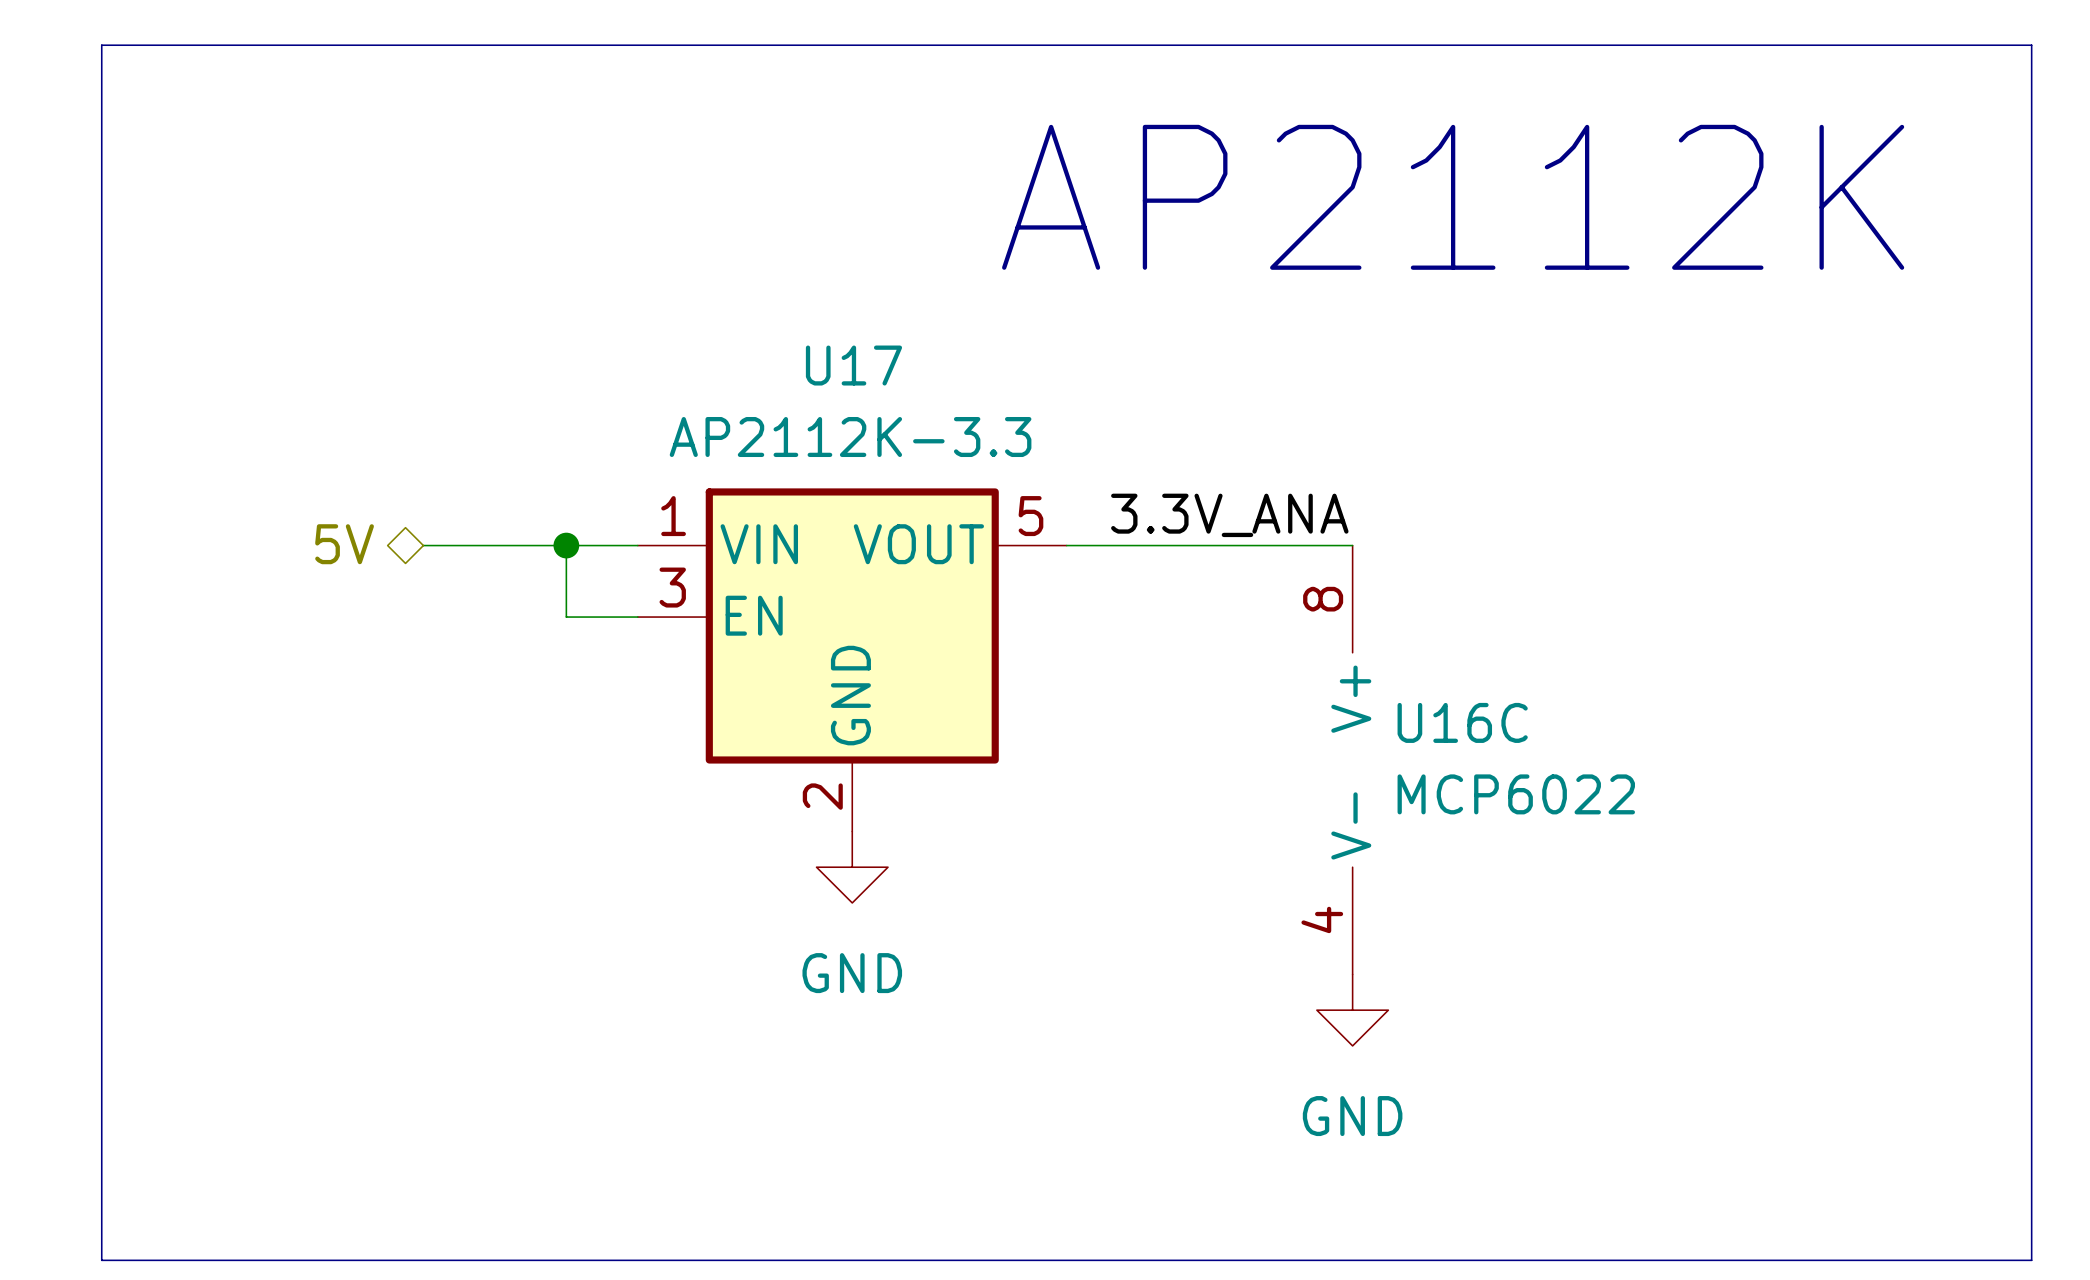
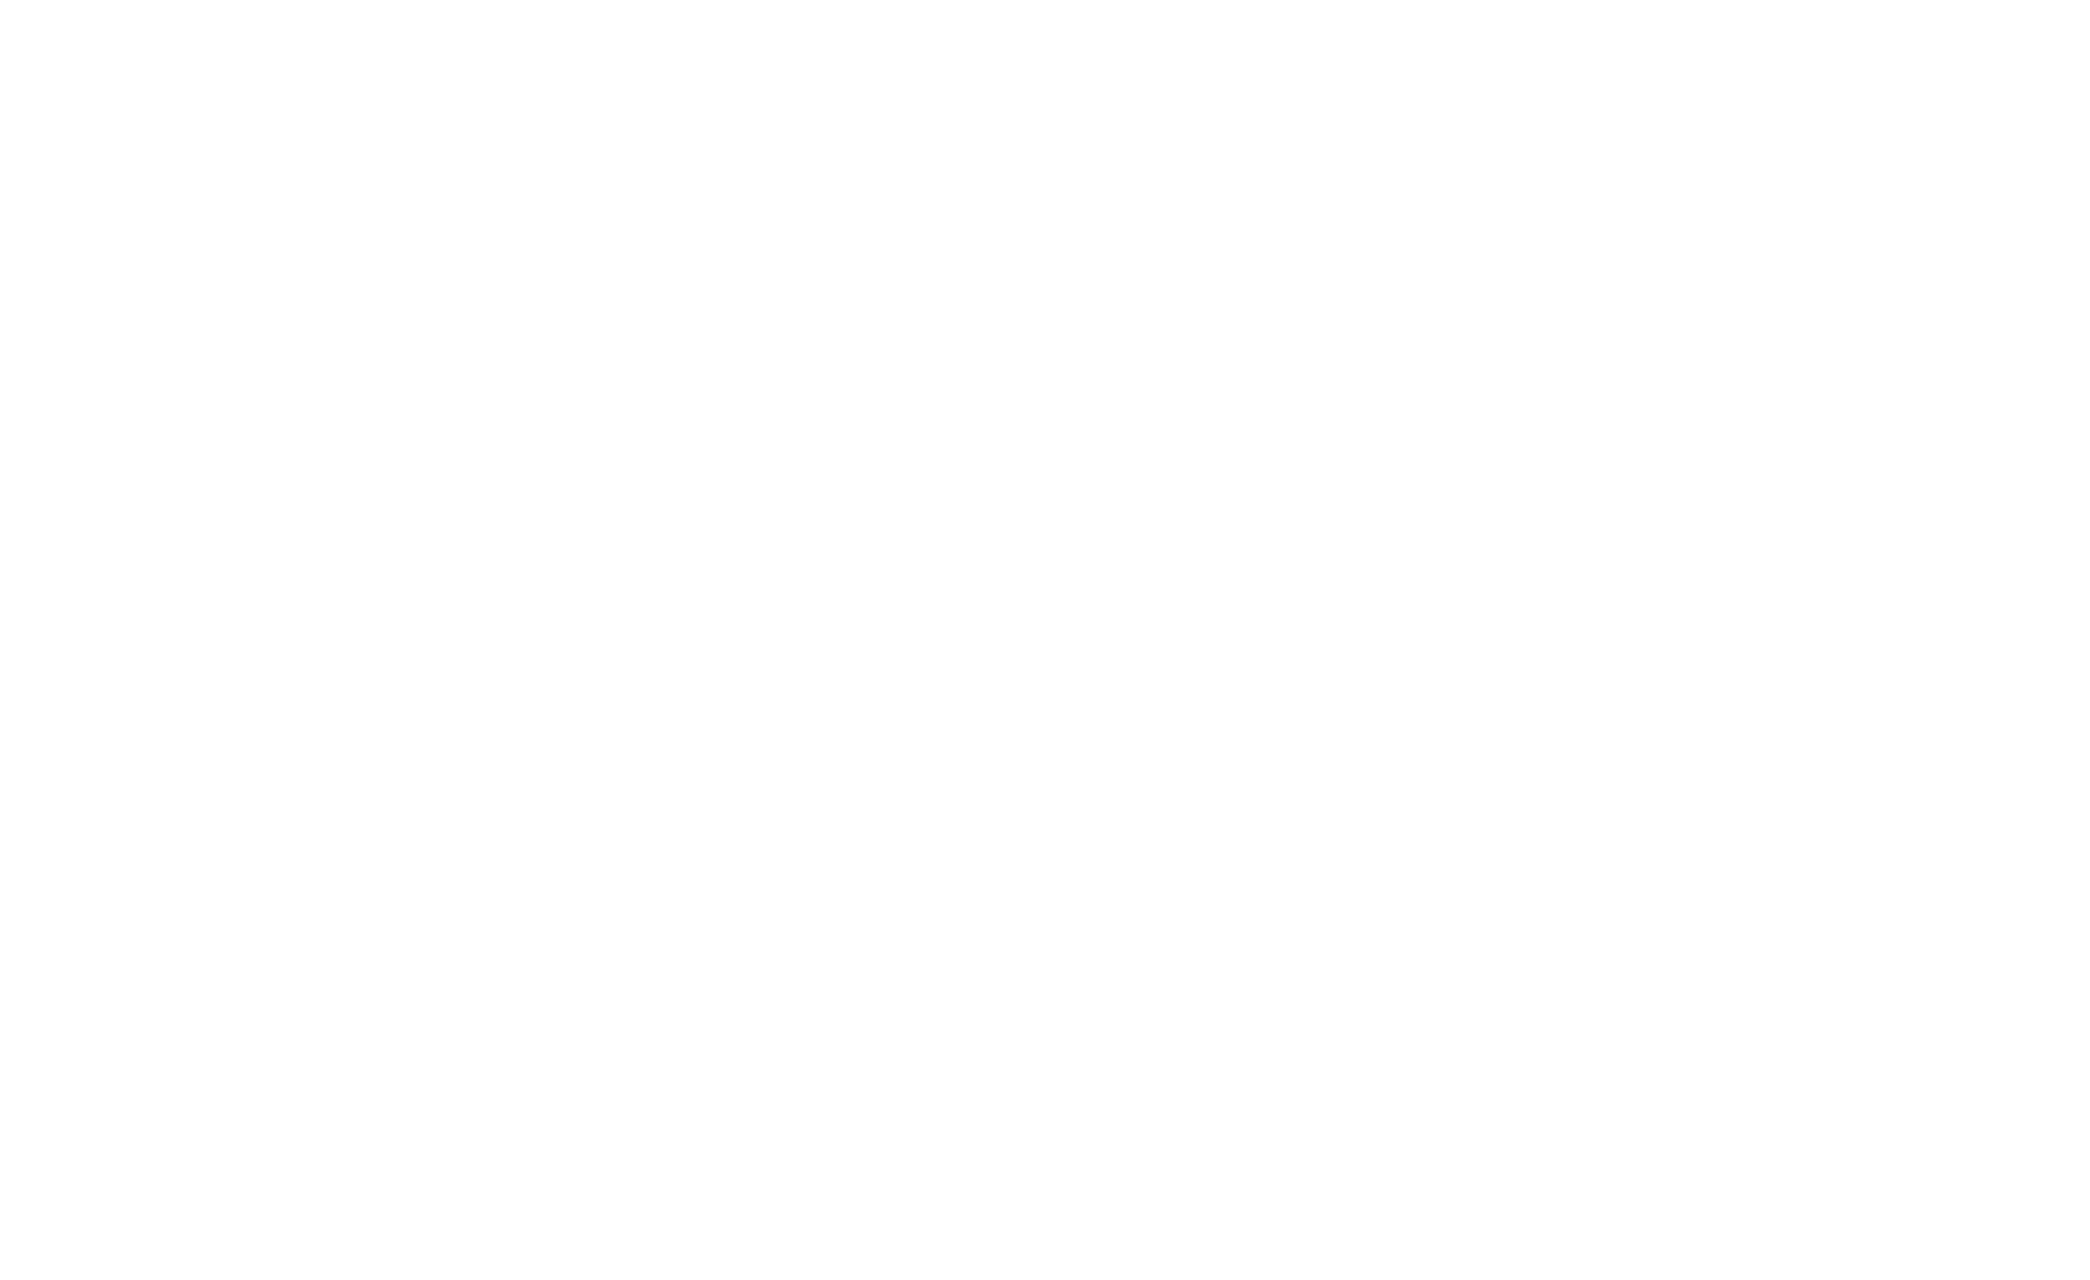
line: (101, 45) (2031, 45) (2031, 1260) (101, 1260) (101, 45) -> none
text: AP2112K (1453, 197) -> none
label: 3.3V_ANA (1229, 515) -> none
hierarchical label: 5V (344, 544) -> none
wire: (423, 545) (637, 545) -> none
wire: (566, 545) (566, 617) (637, 617) -> none
junction: (566, 545) -> none
wire: (1066, 545) (1352, 545) -> none
U17: AP2112K-3.3 (852, 659) -> none
U16C: MCP6022 (1352, 759) -> none
power symbol: GND (852, 867) -> none
power symbol: GND (1352, 1010) -> none

